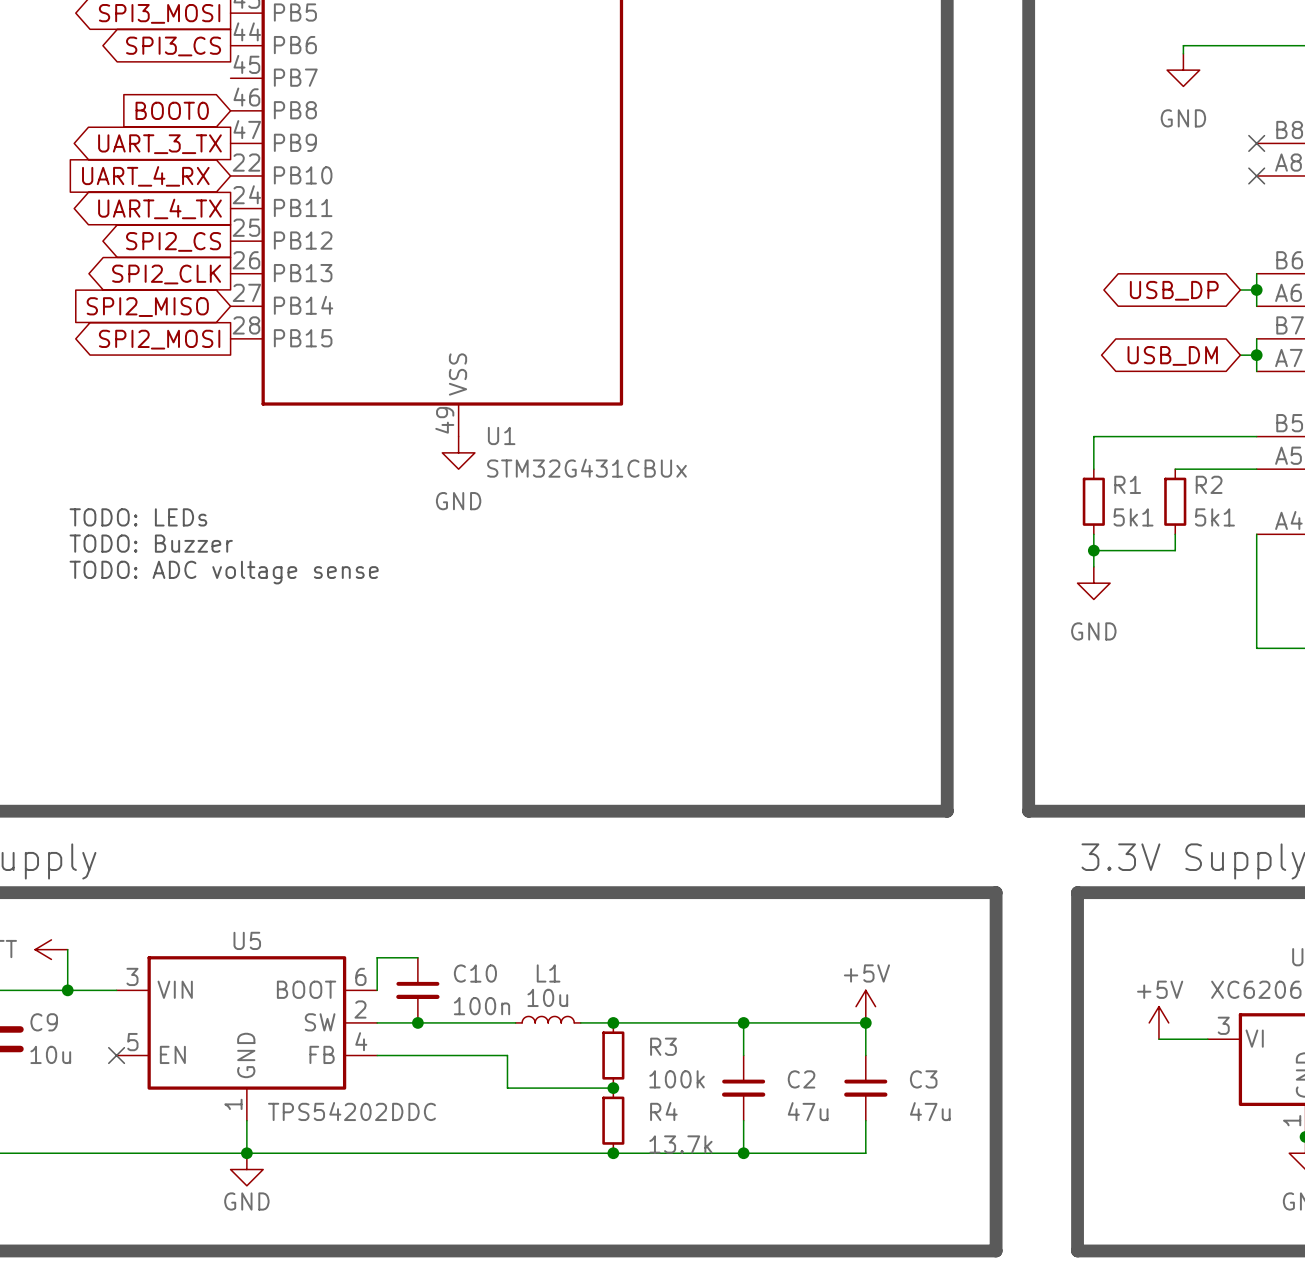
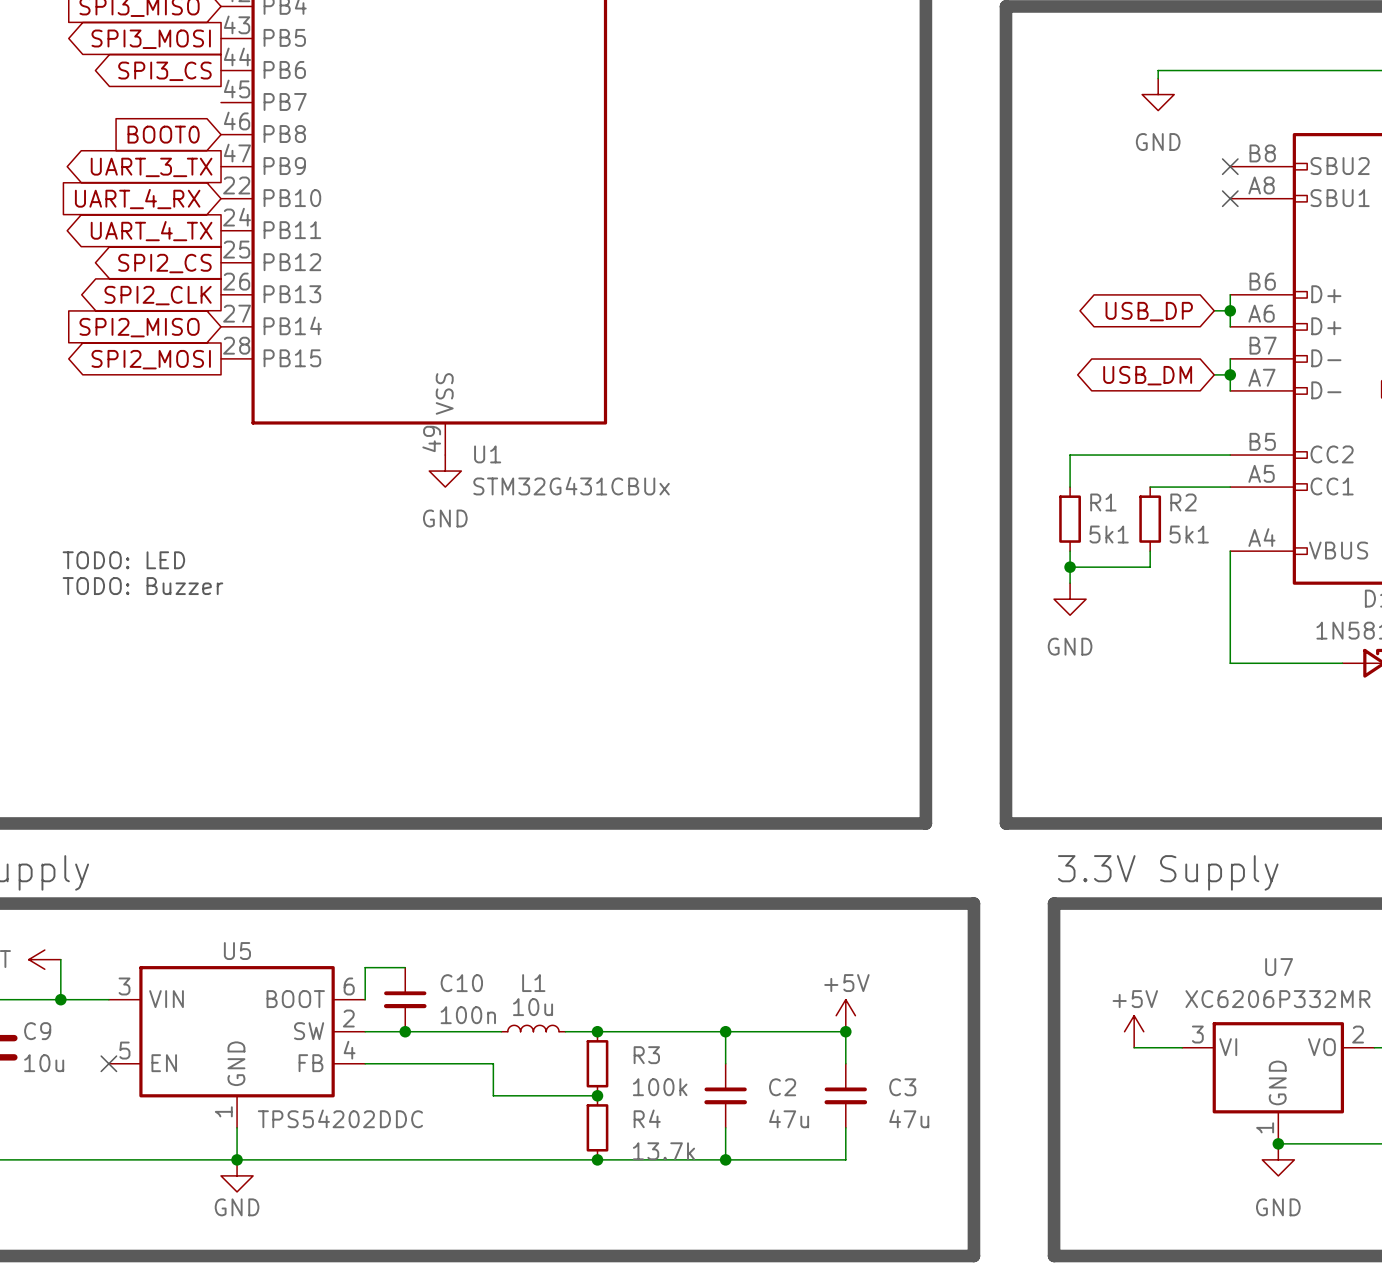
text: TODO: LEDs (138, 517) -> none
text: TODO: Buzzer (151, 543) -> TODO: LED (123, 560)
text: TODO: ADC voltage sense (224, 572) -> TODO: Buzzer (142, 586)

